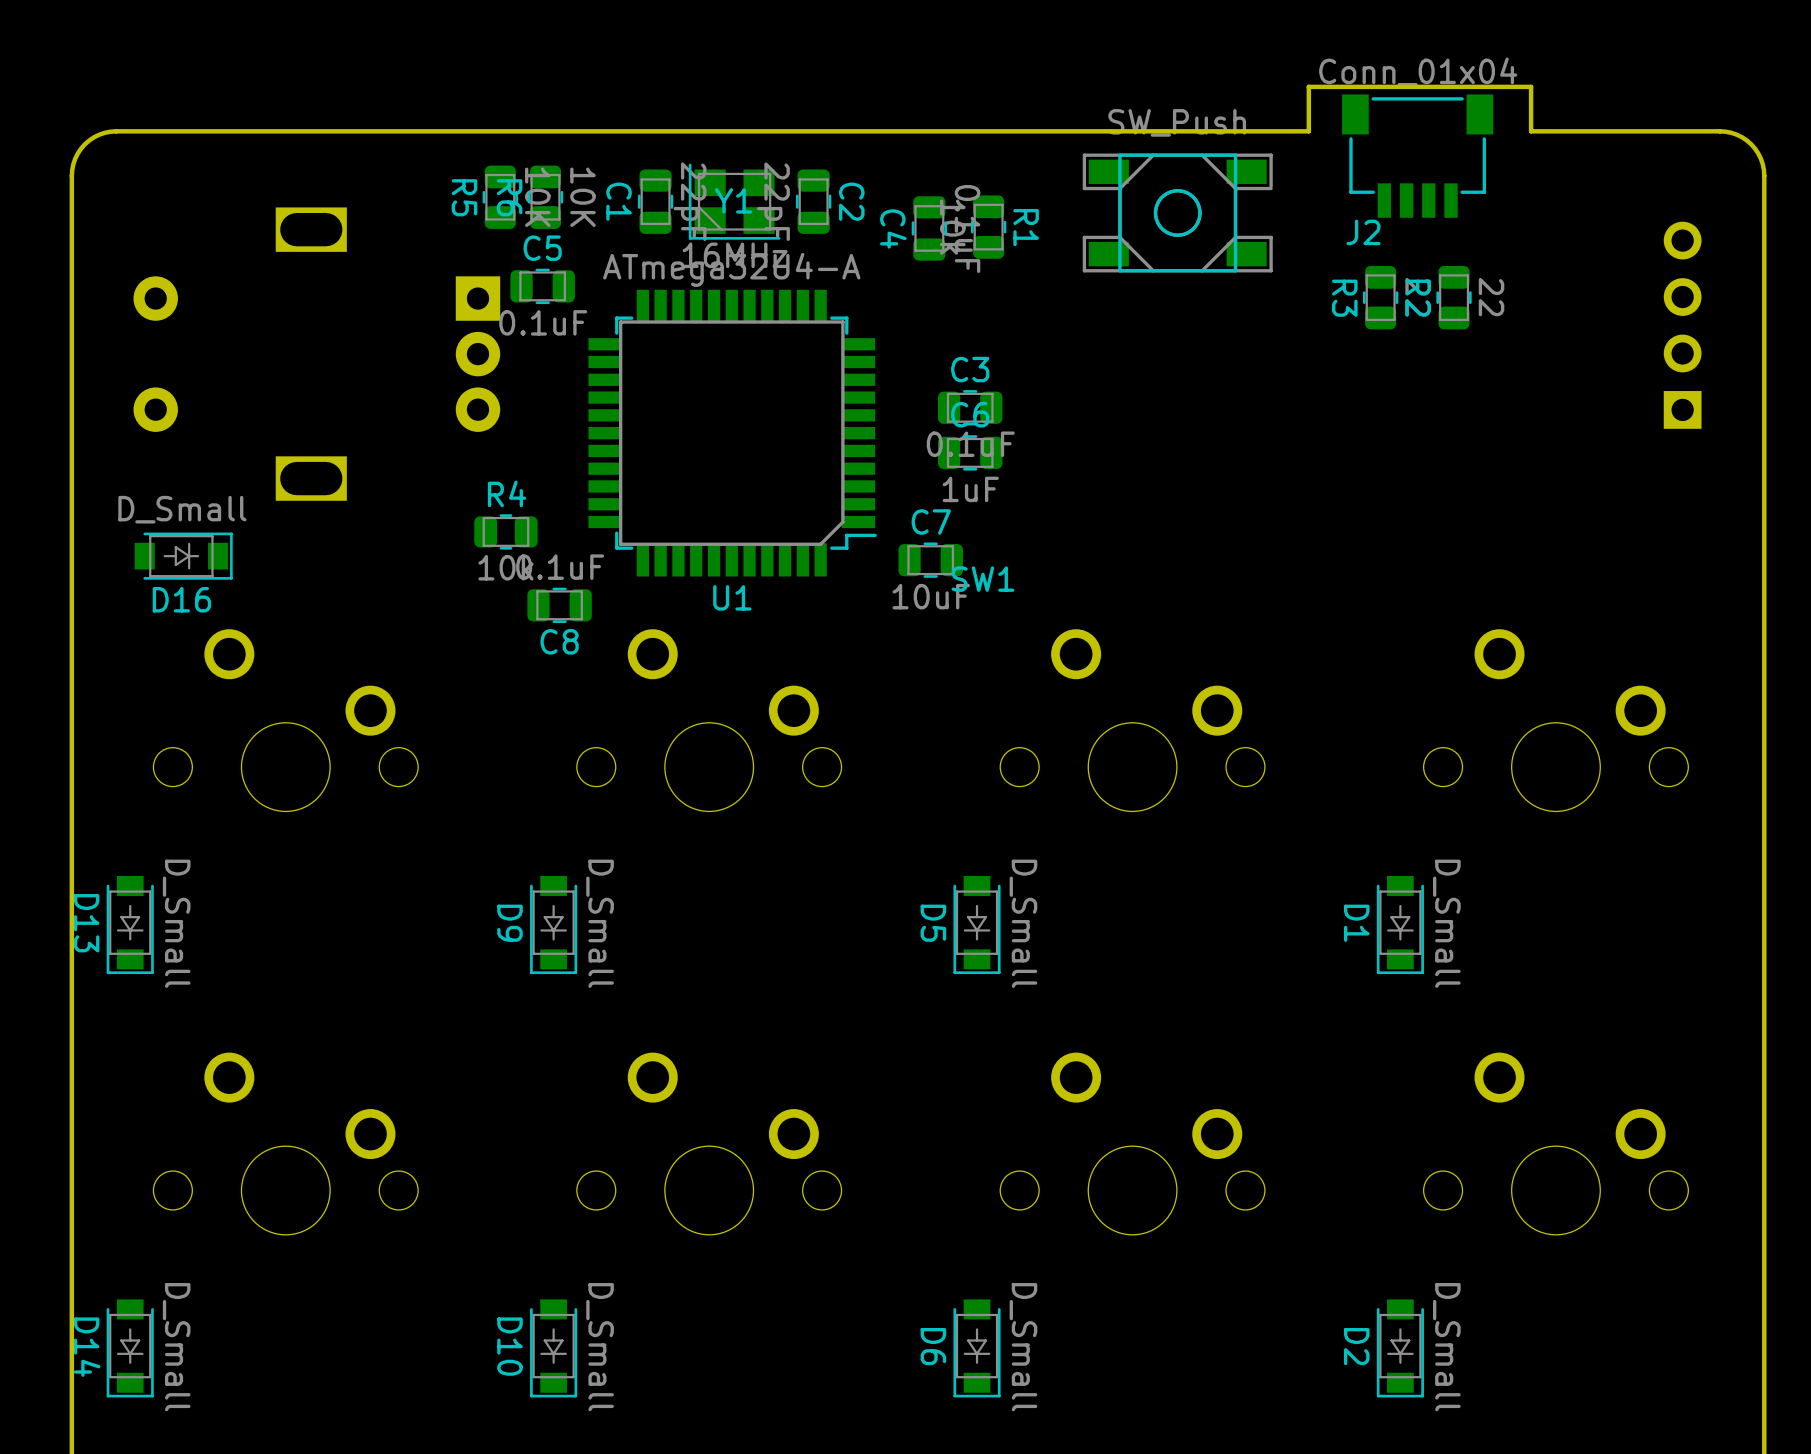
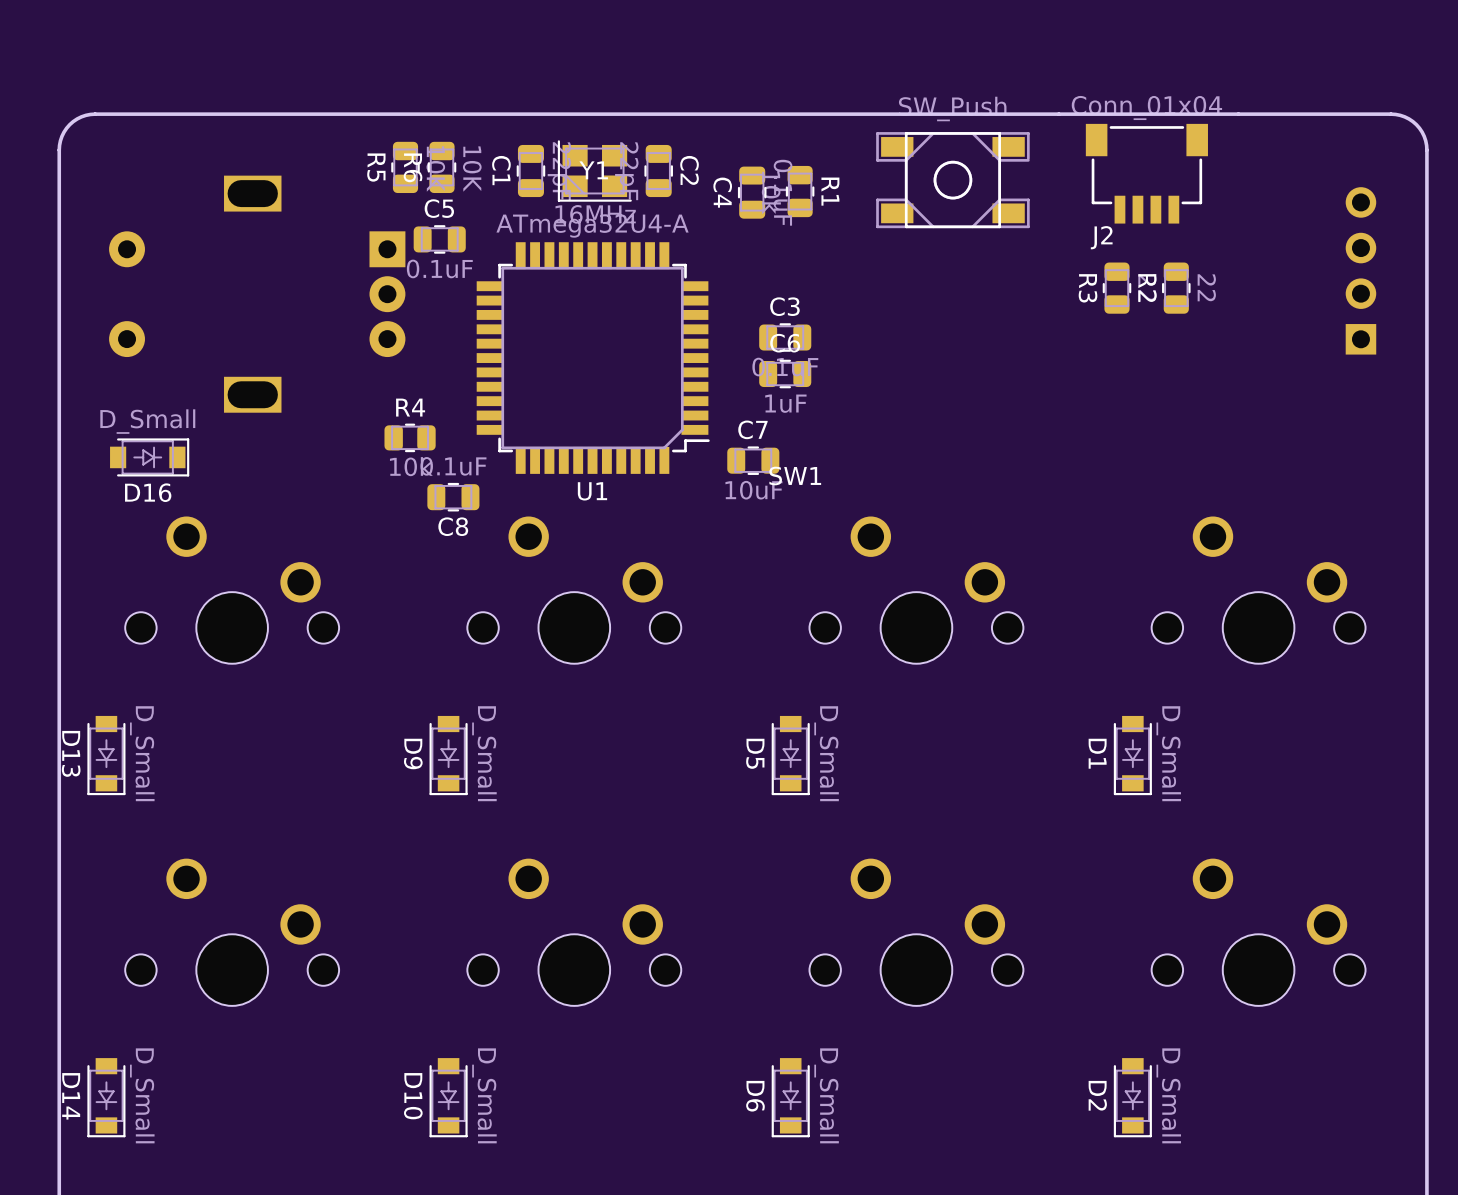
board edge: (1531, 131) (1531, 86) (1308, 86) (1308, 131) -> (1238, 114) (1058, 114)
J2 position: (1417, 156) -> (1146, 173)
R3 position: (1380, 297) -> (1116, 288)
R2 position: (1454, 297) -> (1176, 288)

